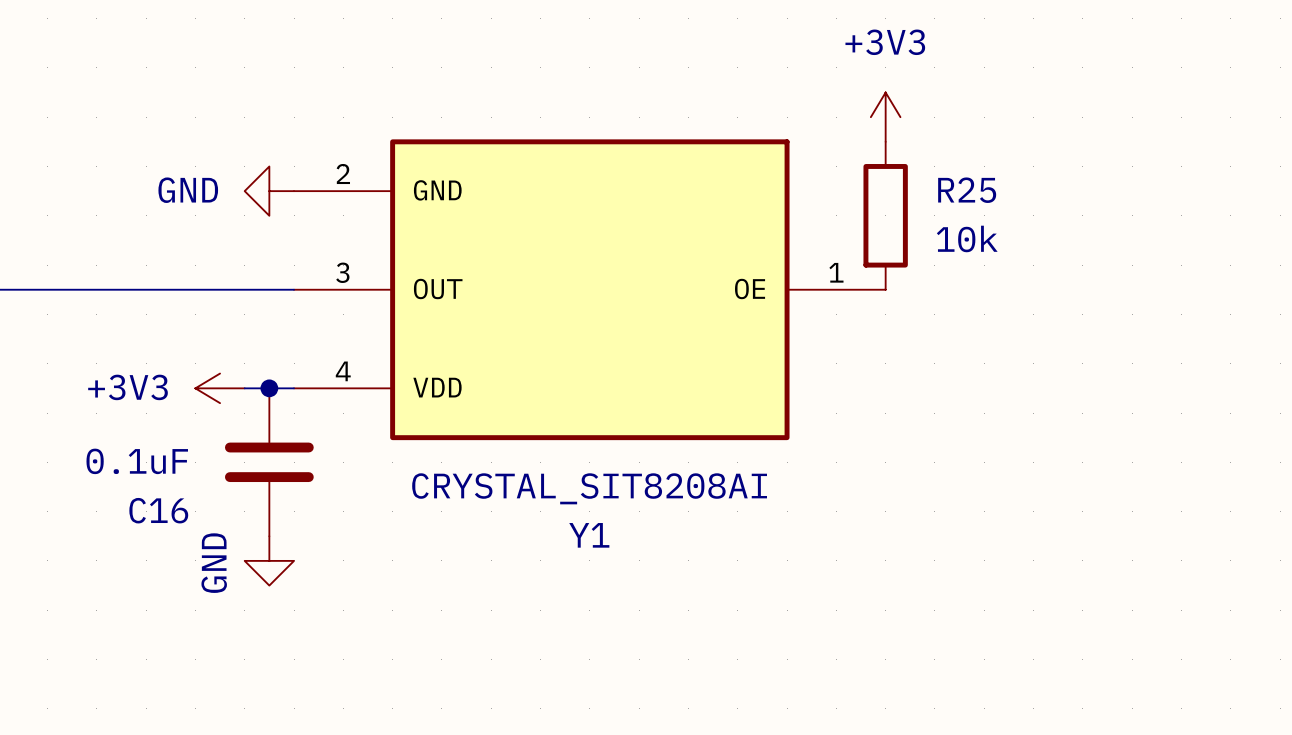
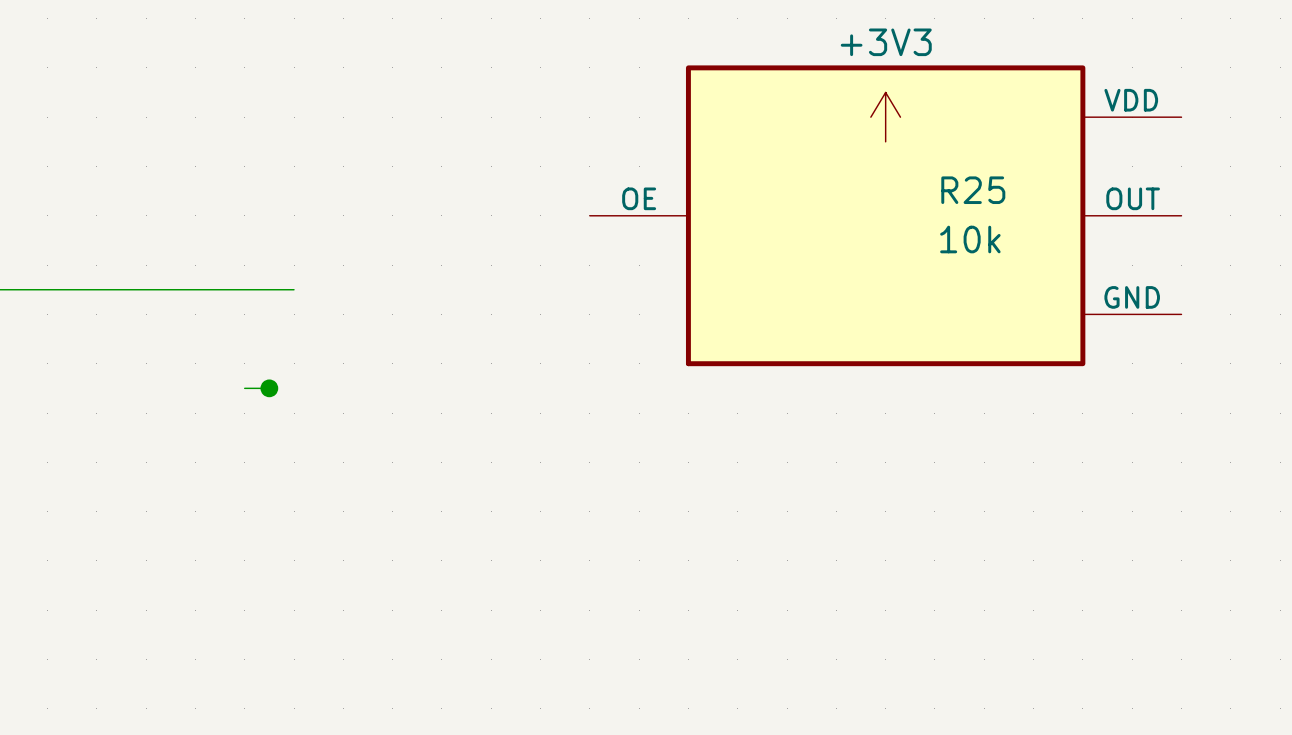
R25 symbol: [863, 141, 908, 290] -> [589, 65, 1182, 367]
power symbol: GND (269, 191) -> none
Y1: CRYSTAL_SIT8208AI (589, 289) -> none
power symbol: +3V3 (220, 388) -> none
wire: (269, 388) (294, 388) -> none
C16: 0.1uF (269, 462) -> none
power symbol: GND (269, 560) -> none

